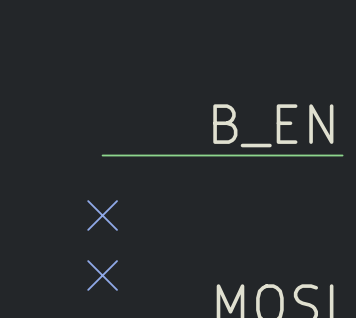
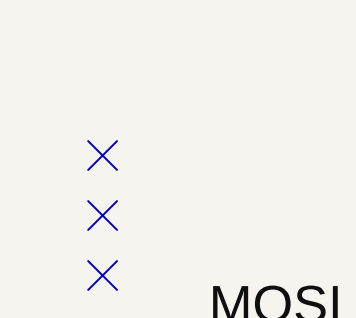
label: B_EN (273, 125) -> none
wire: (102, 155) (342, 155) -> none
no-connect mark: none -> (102, 155)

